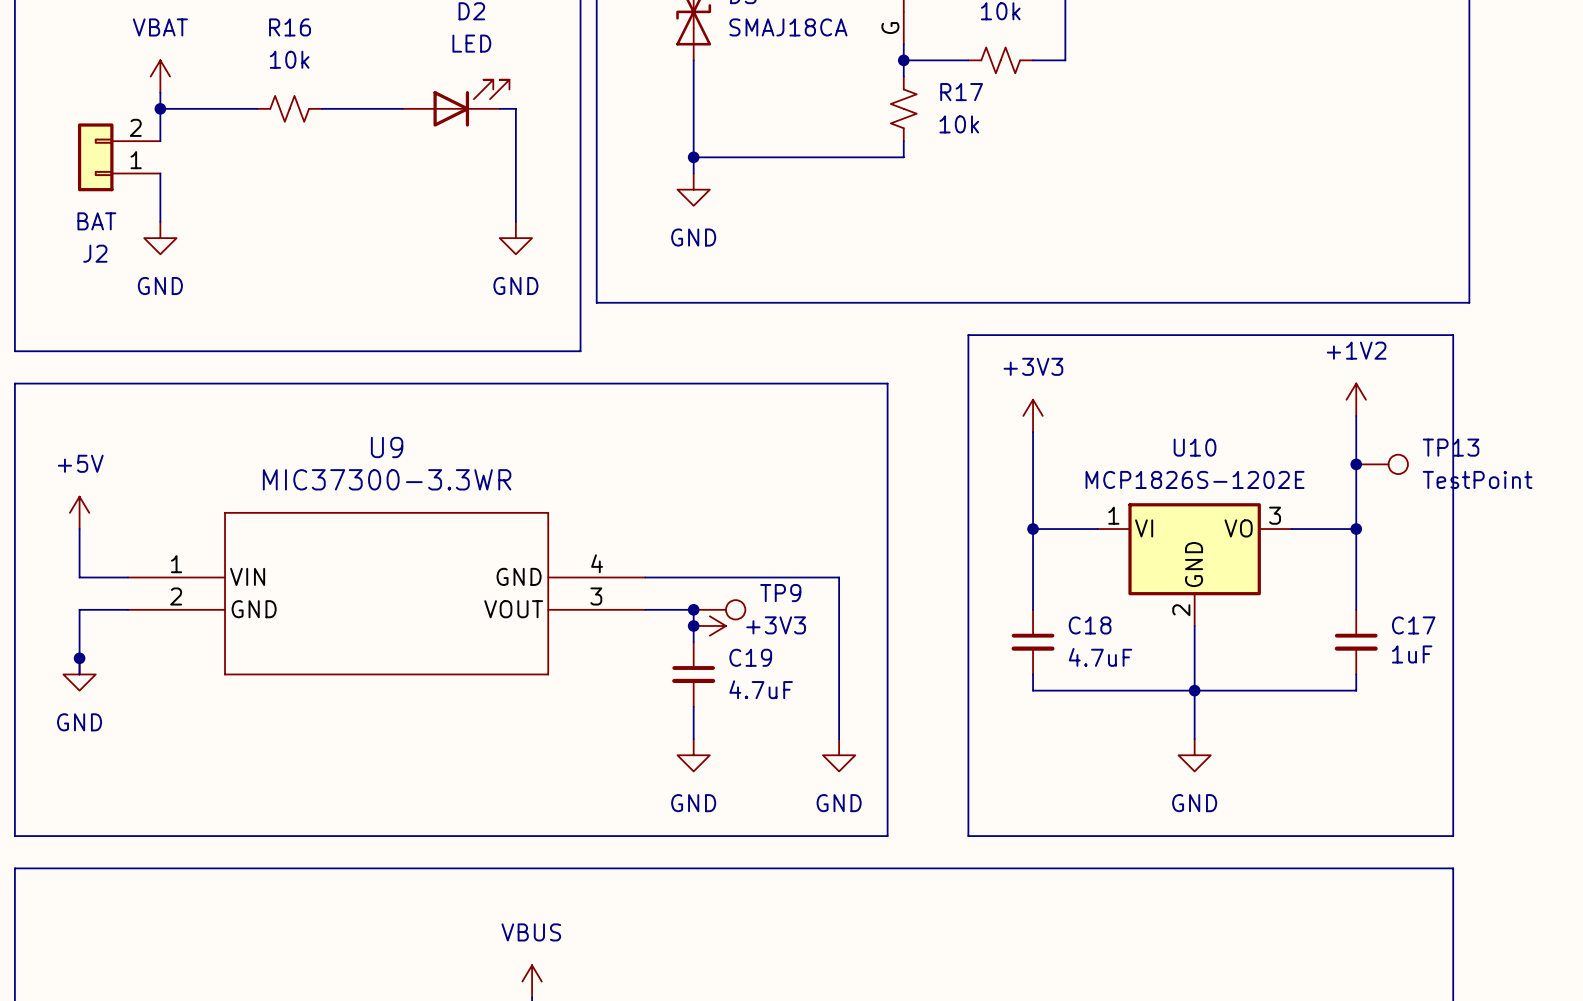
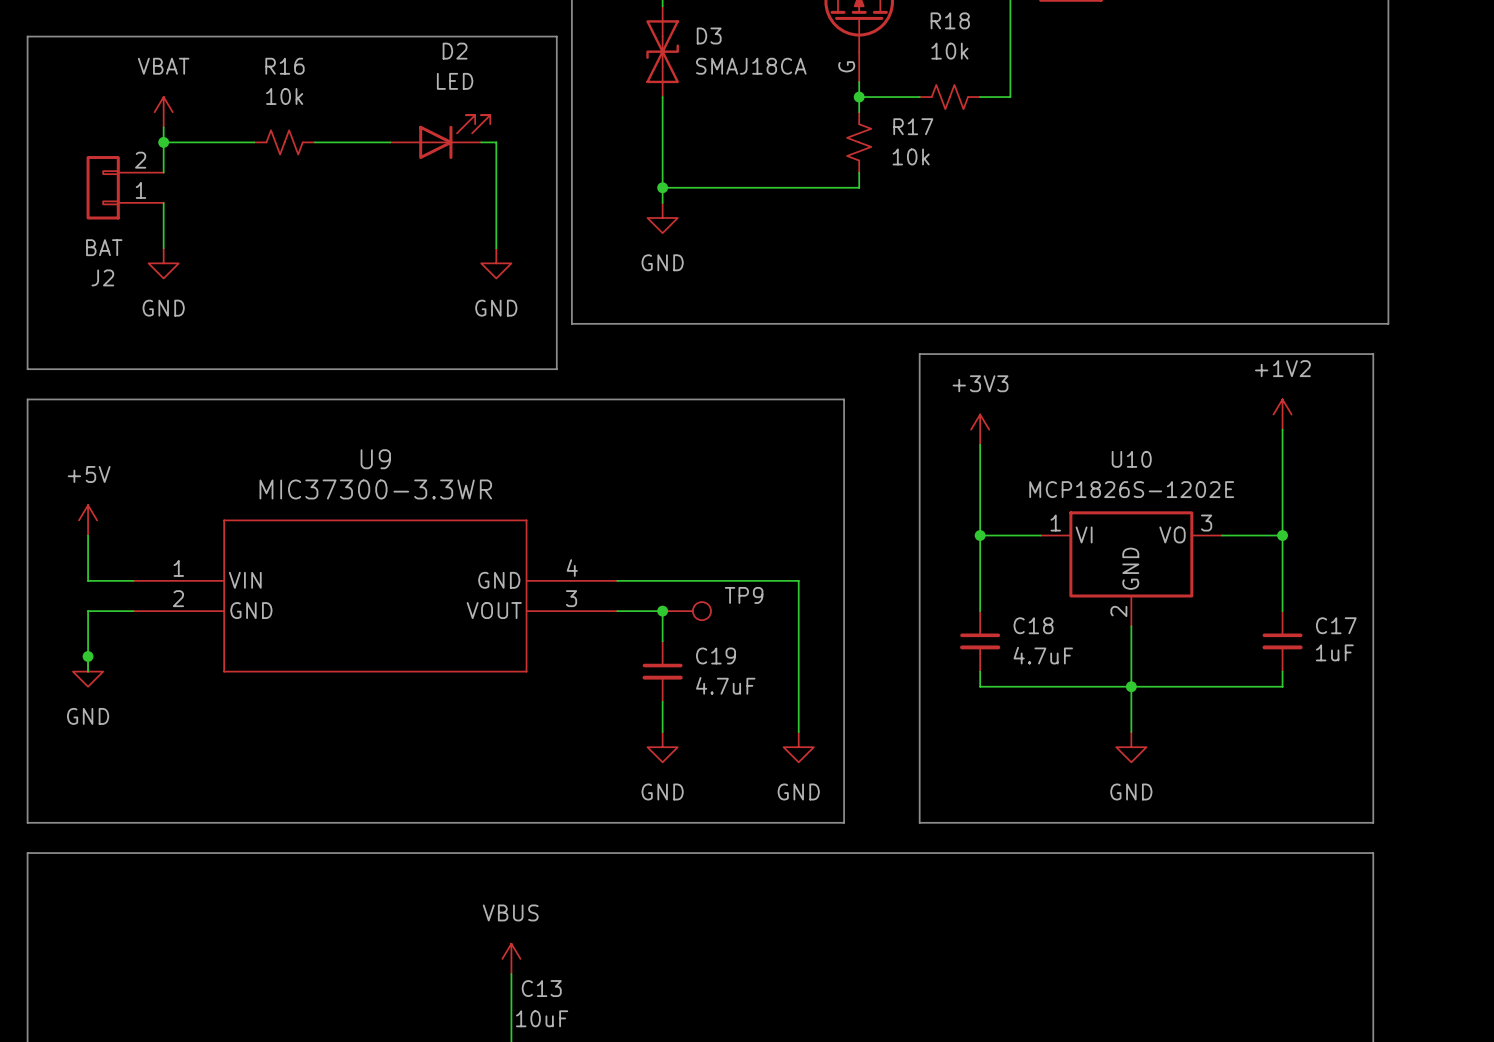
junction: (1356, 464) -> none
TP13: TestPoint (1382, 464) -> none
junction: (693, 625) -> none
power symbol: +3V3 (709, 625) -> none

